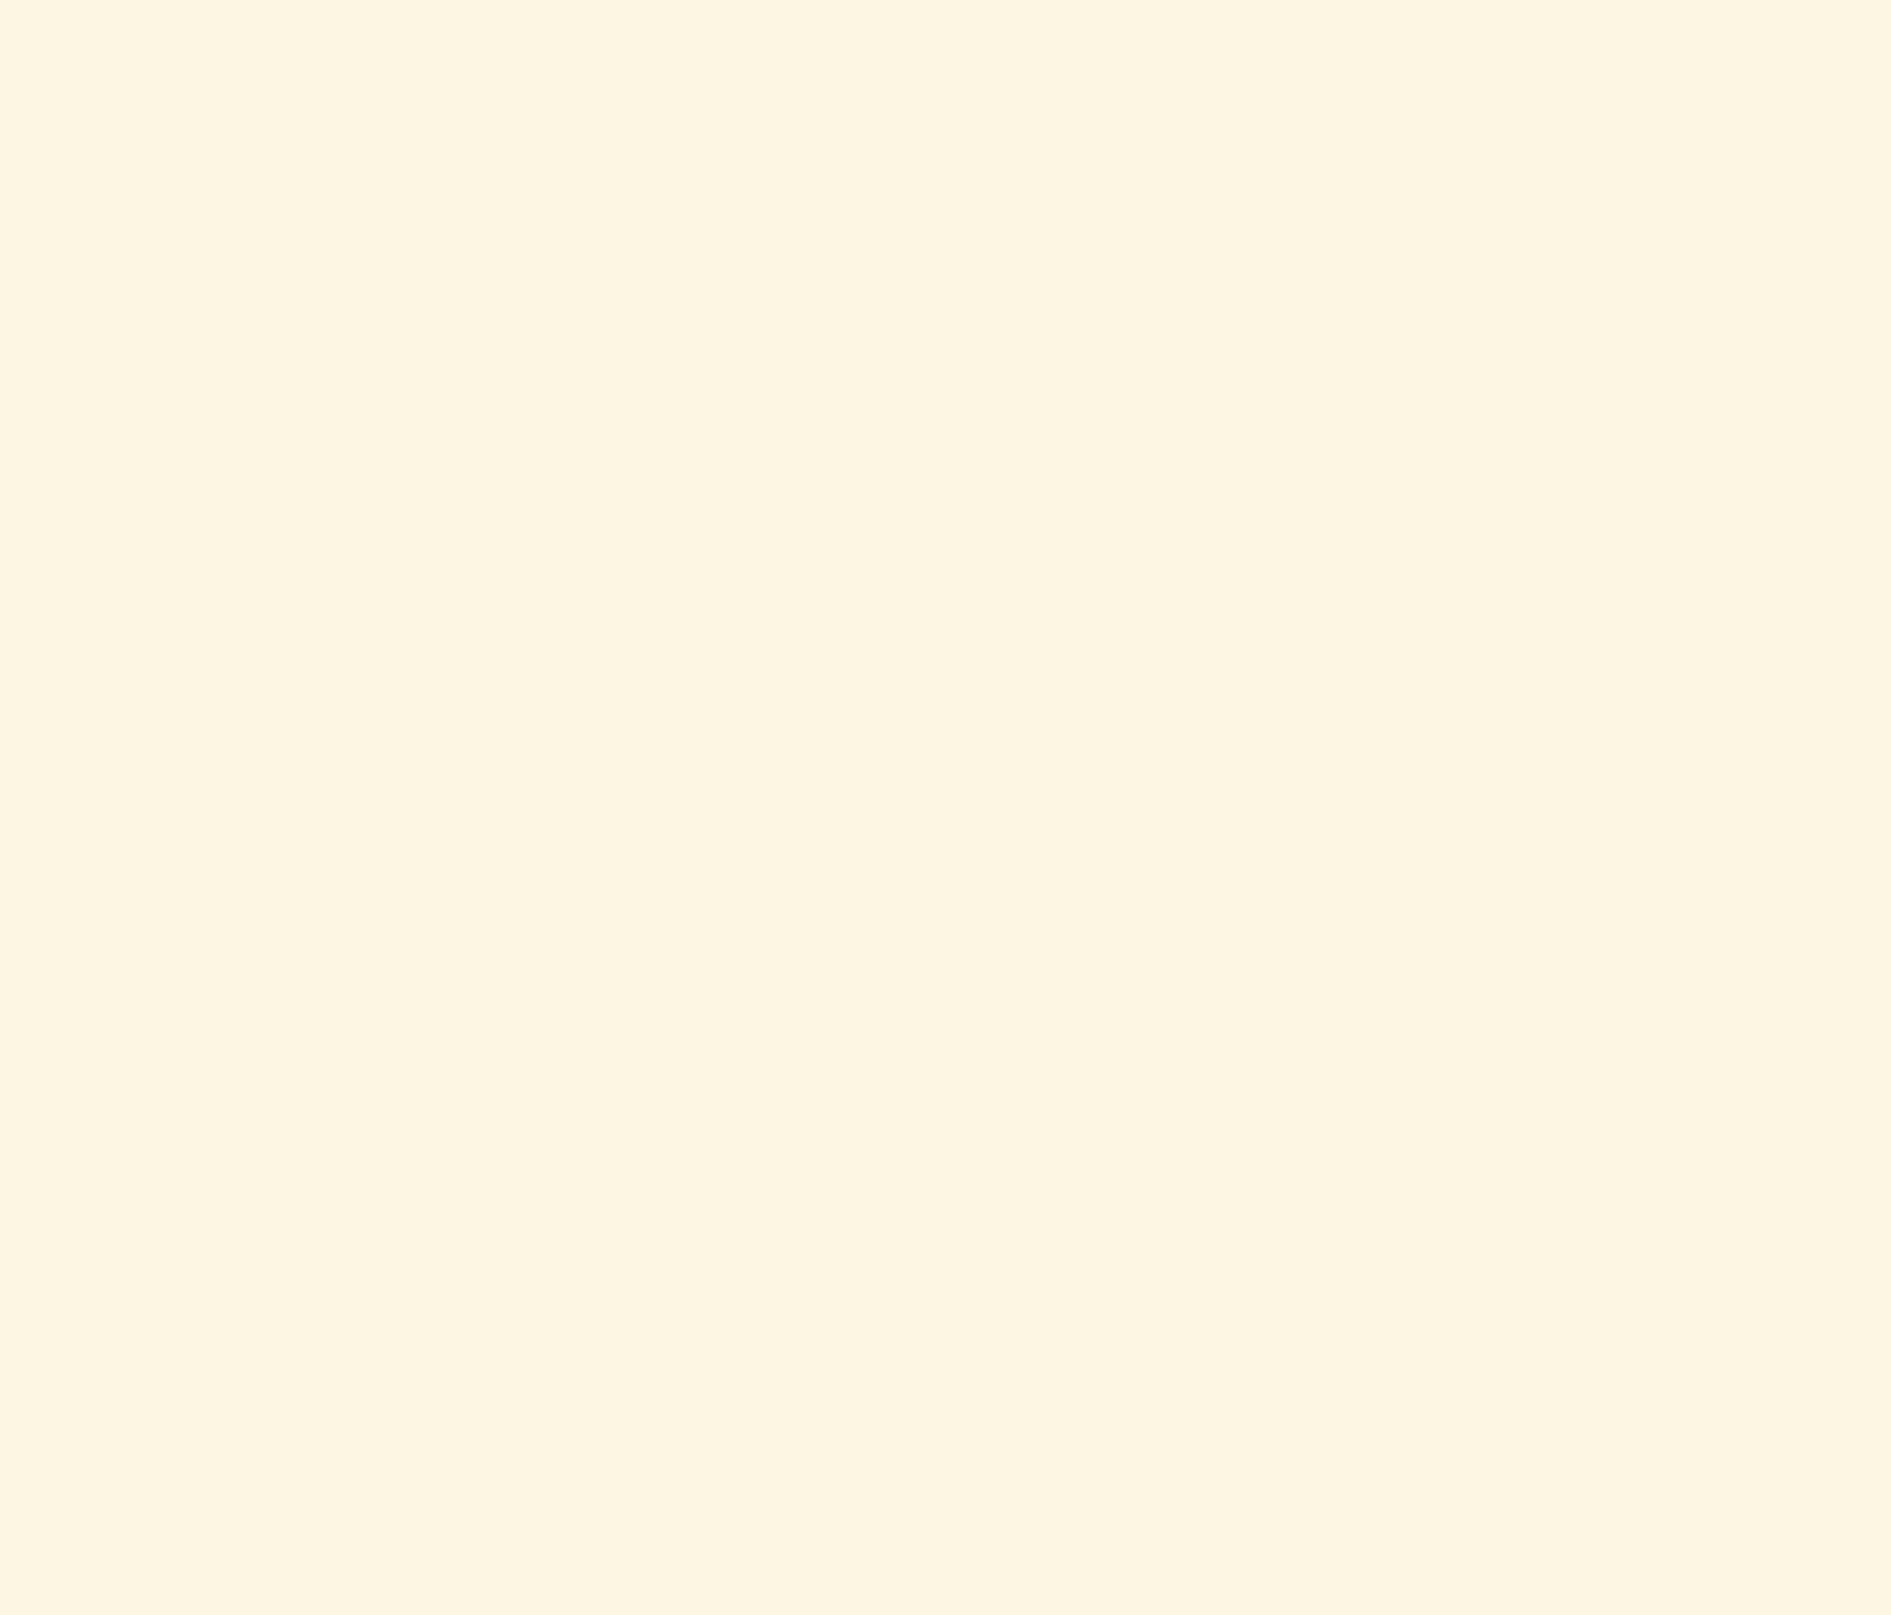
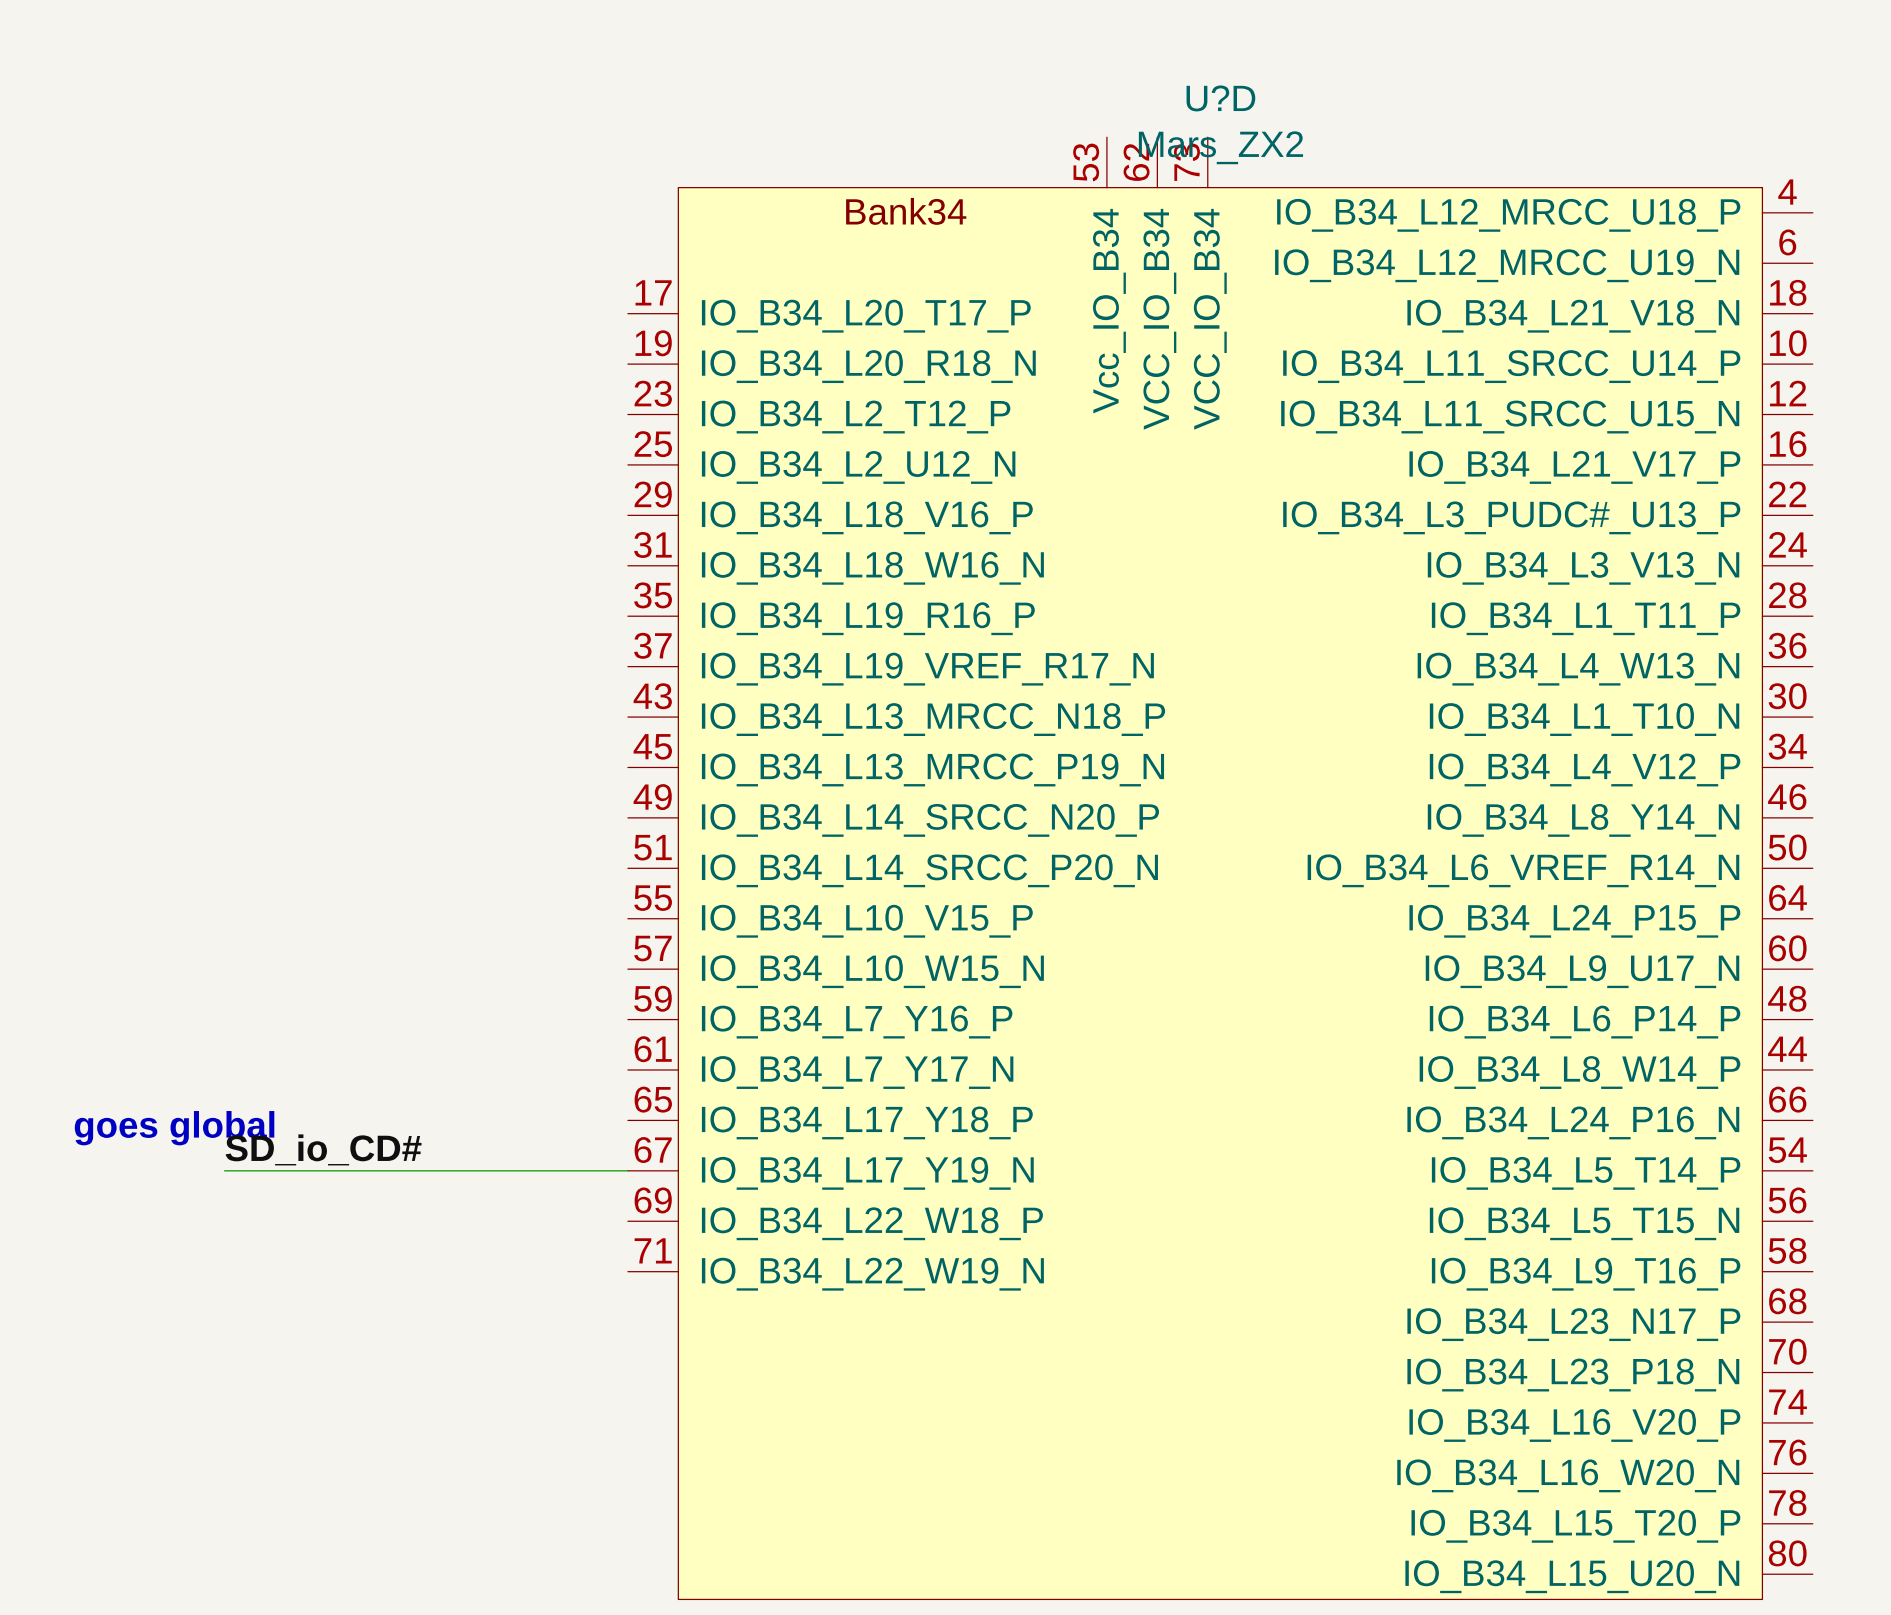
U?D: none -> Mars_ZX2 (1220, 868)
text: none -> goes global (174, 1128)
label: none -> SD_io_CD# (323, 1149)
wire: none -> (224, 1170) (627, 1170)

